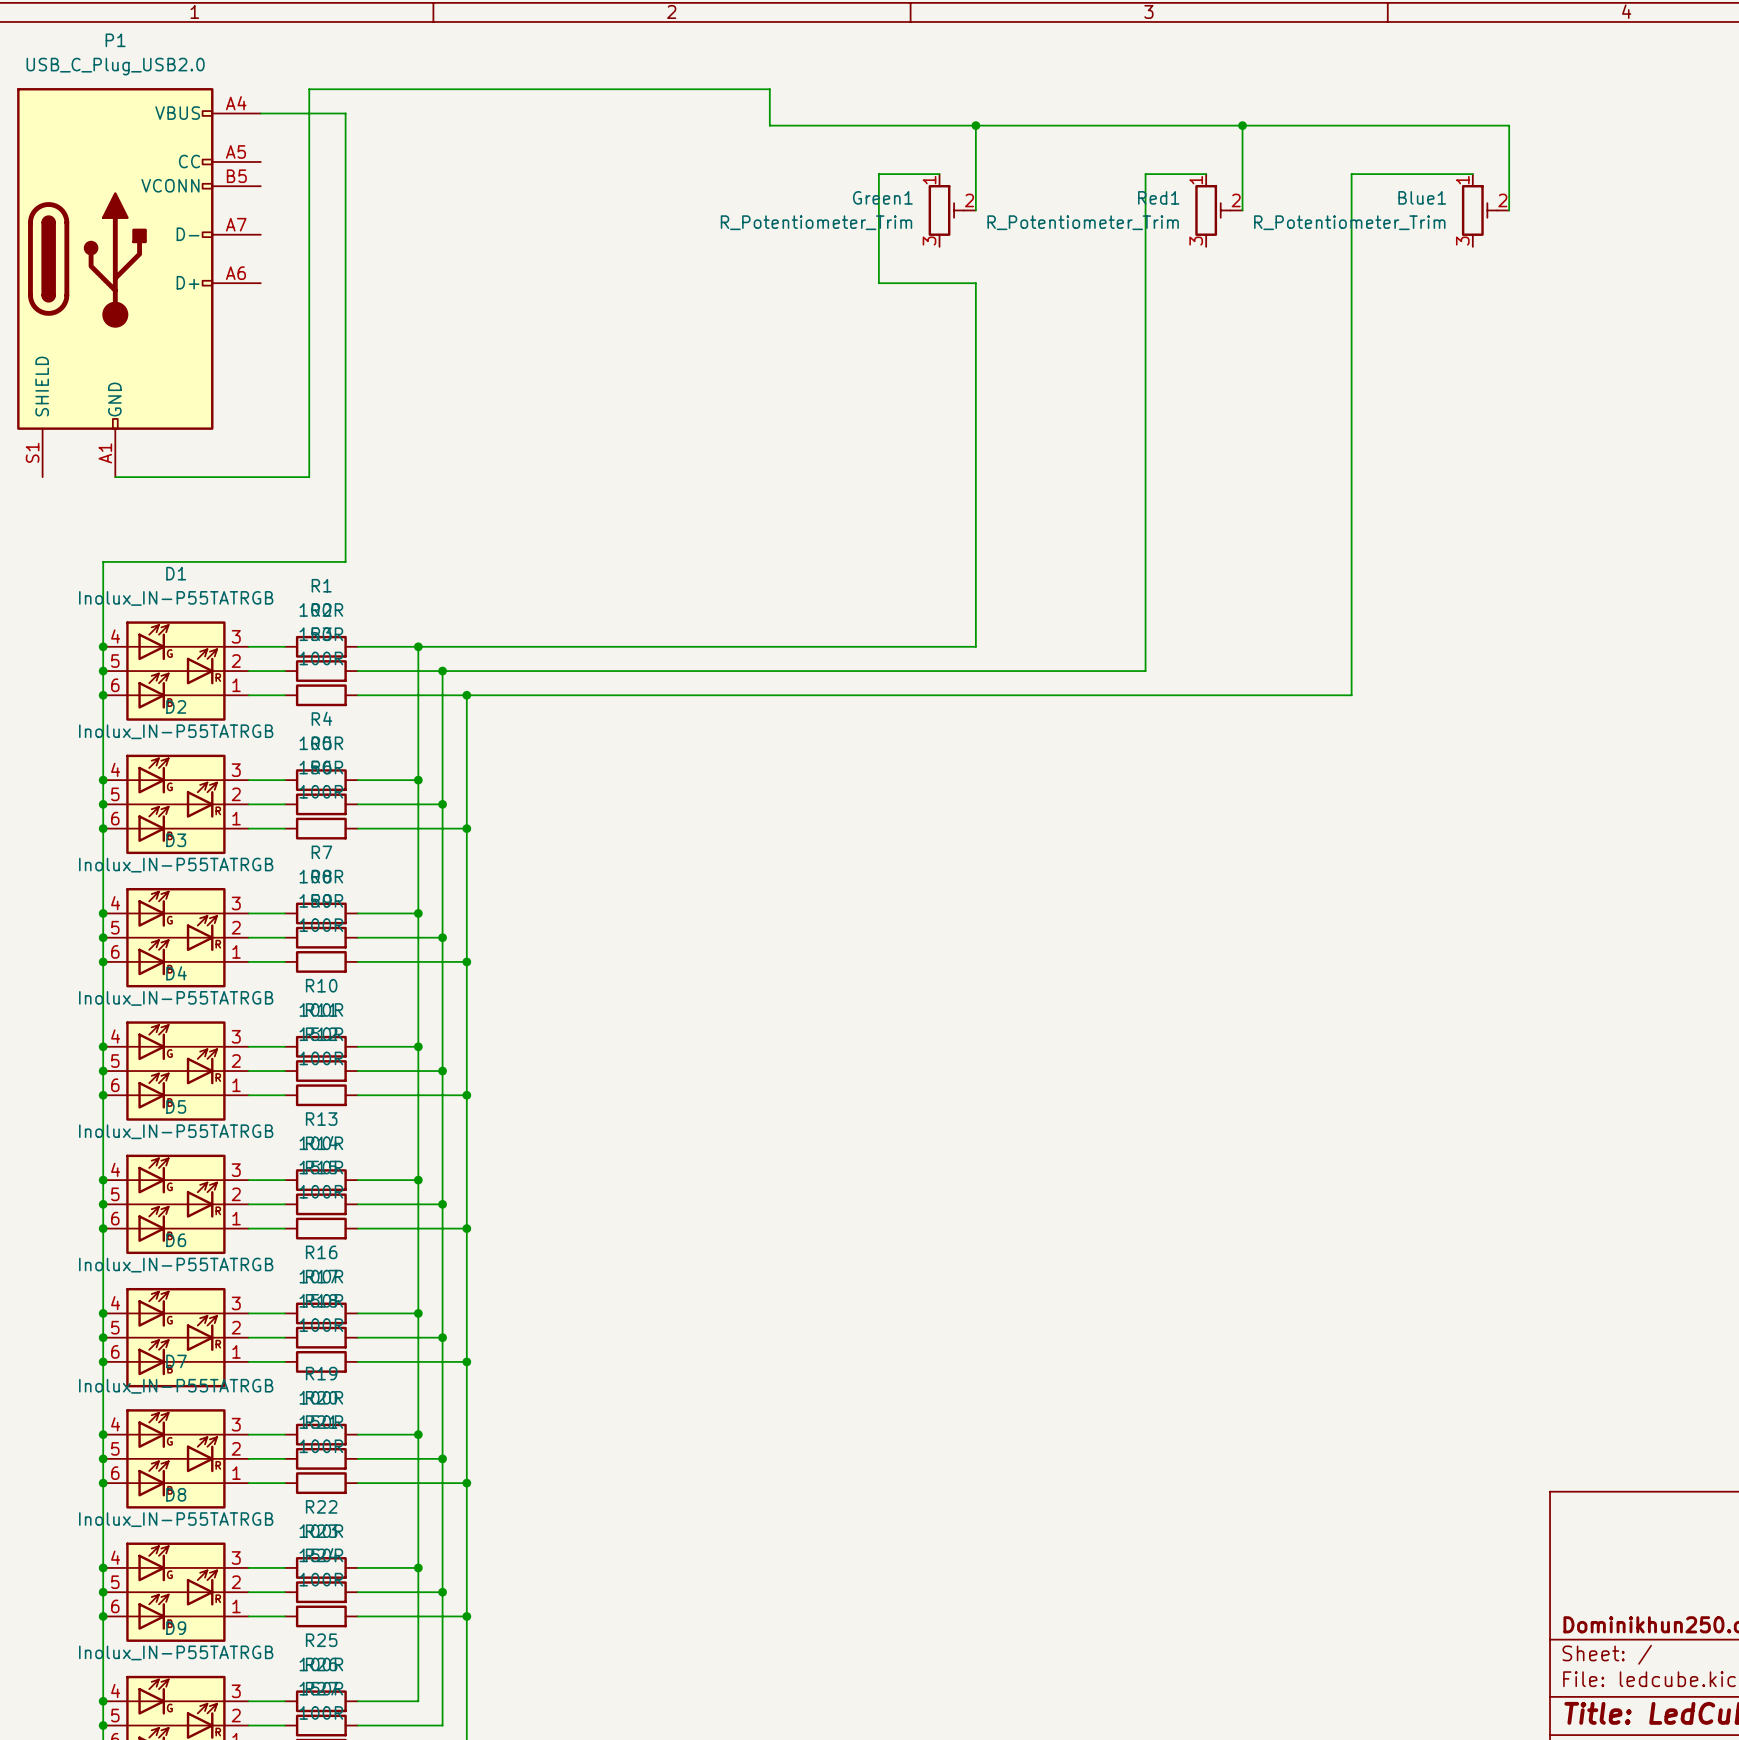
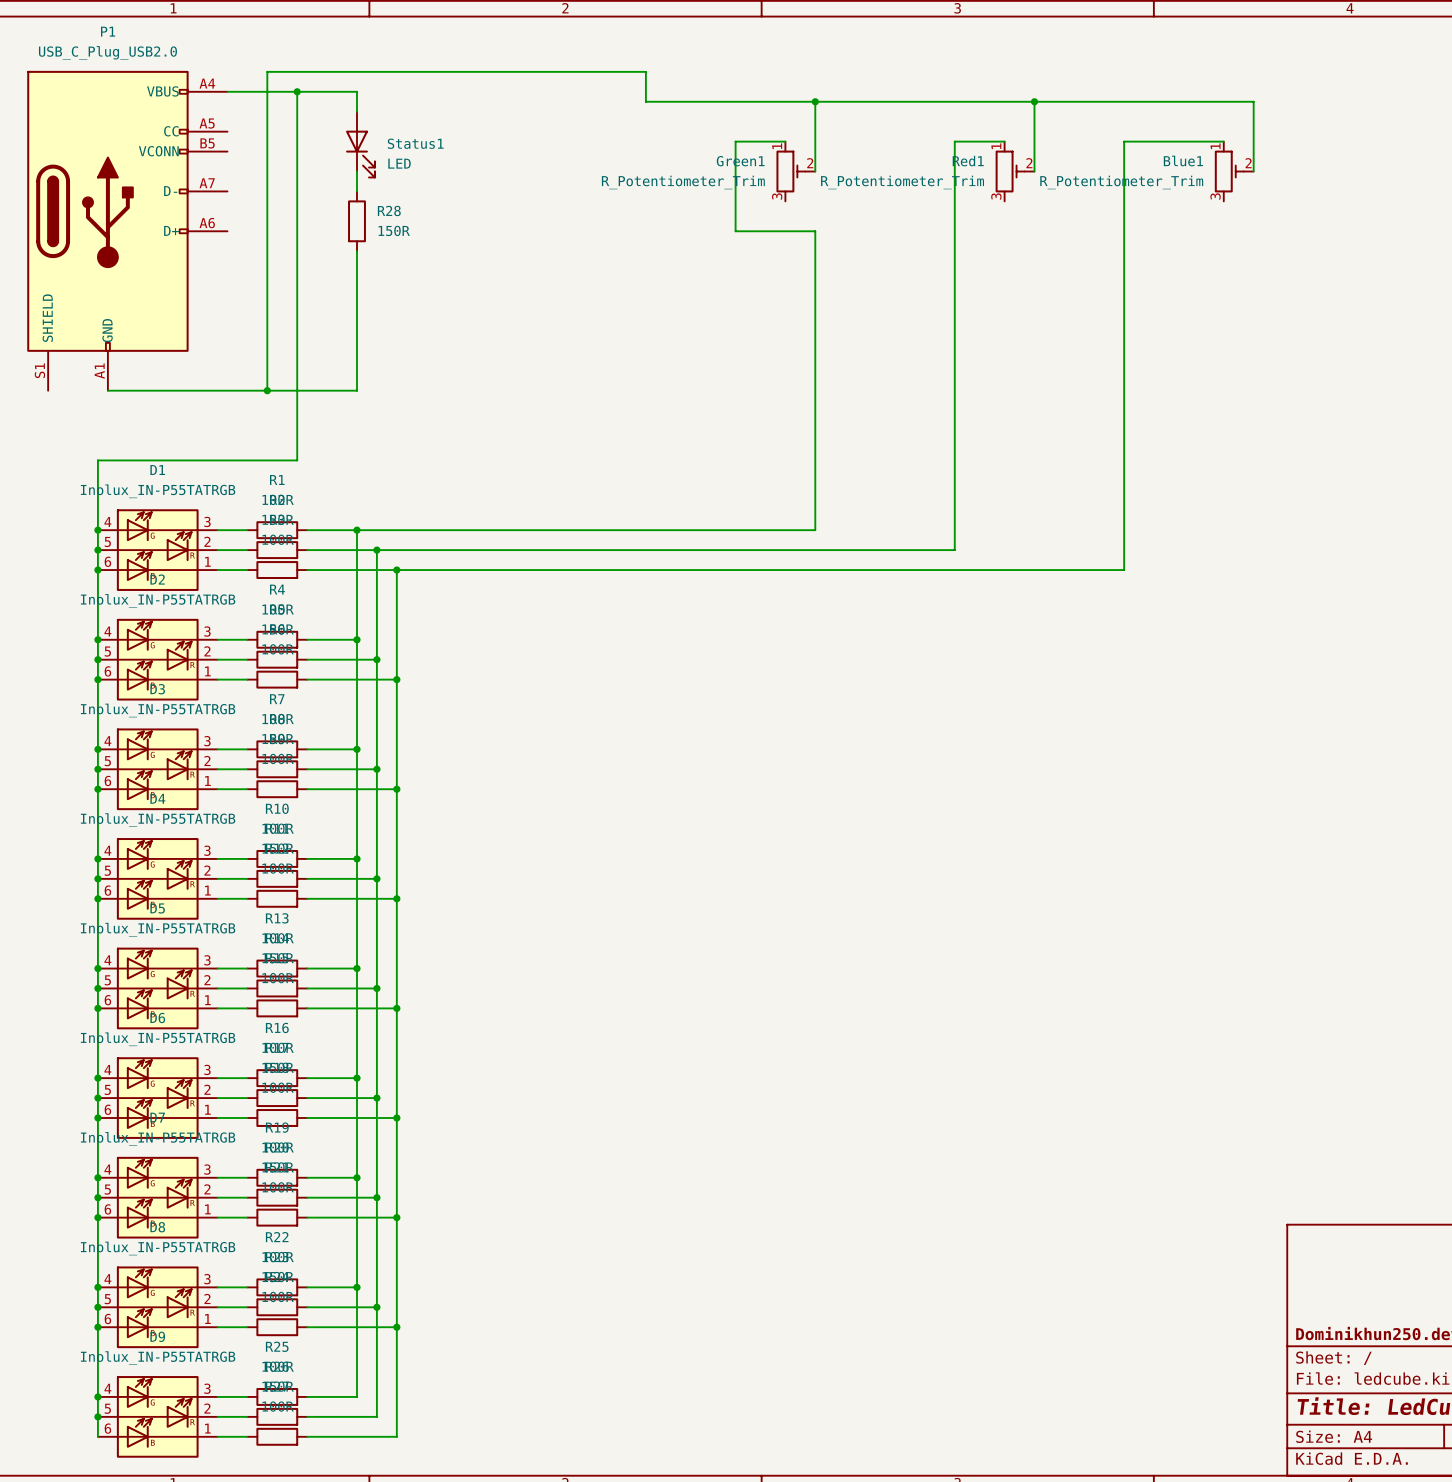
wire: none -> (297, 91) (356, 91) (356, 111)
junction: none -> (297, 91)
Status1: none -> LED (360, 144)
wire: none -> (356, 171) (356, 191)
R28: none -> 150R (356, 221)
wire: none -> (356, 251) (356, 390) (267, 390)
junction: none -> (267, 390)

